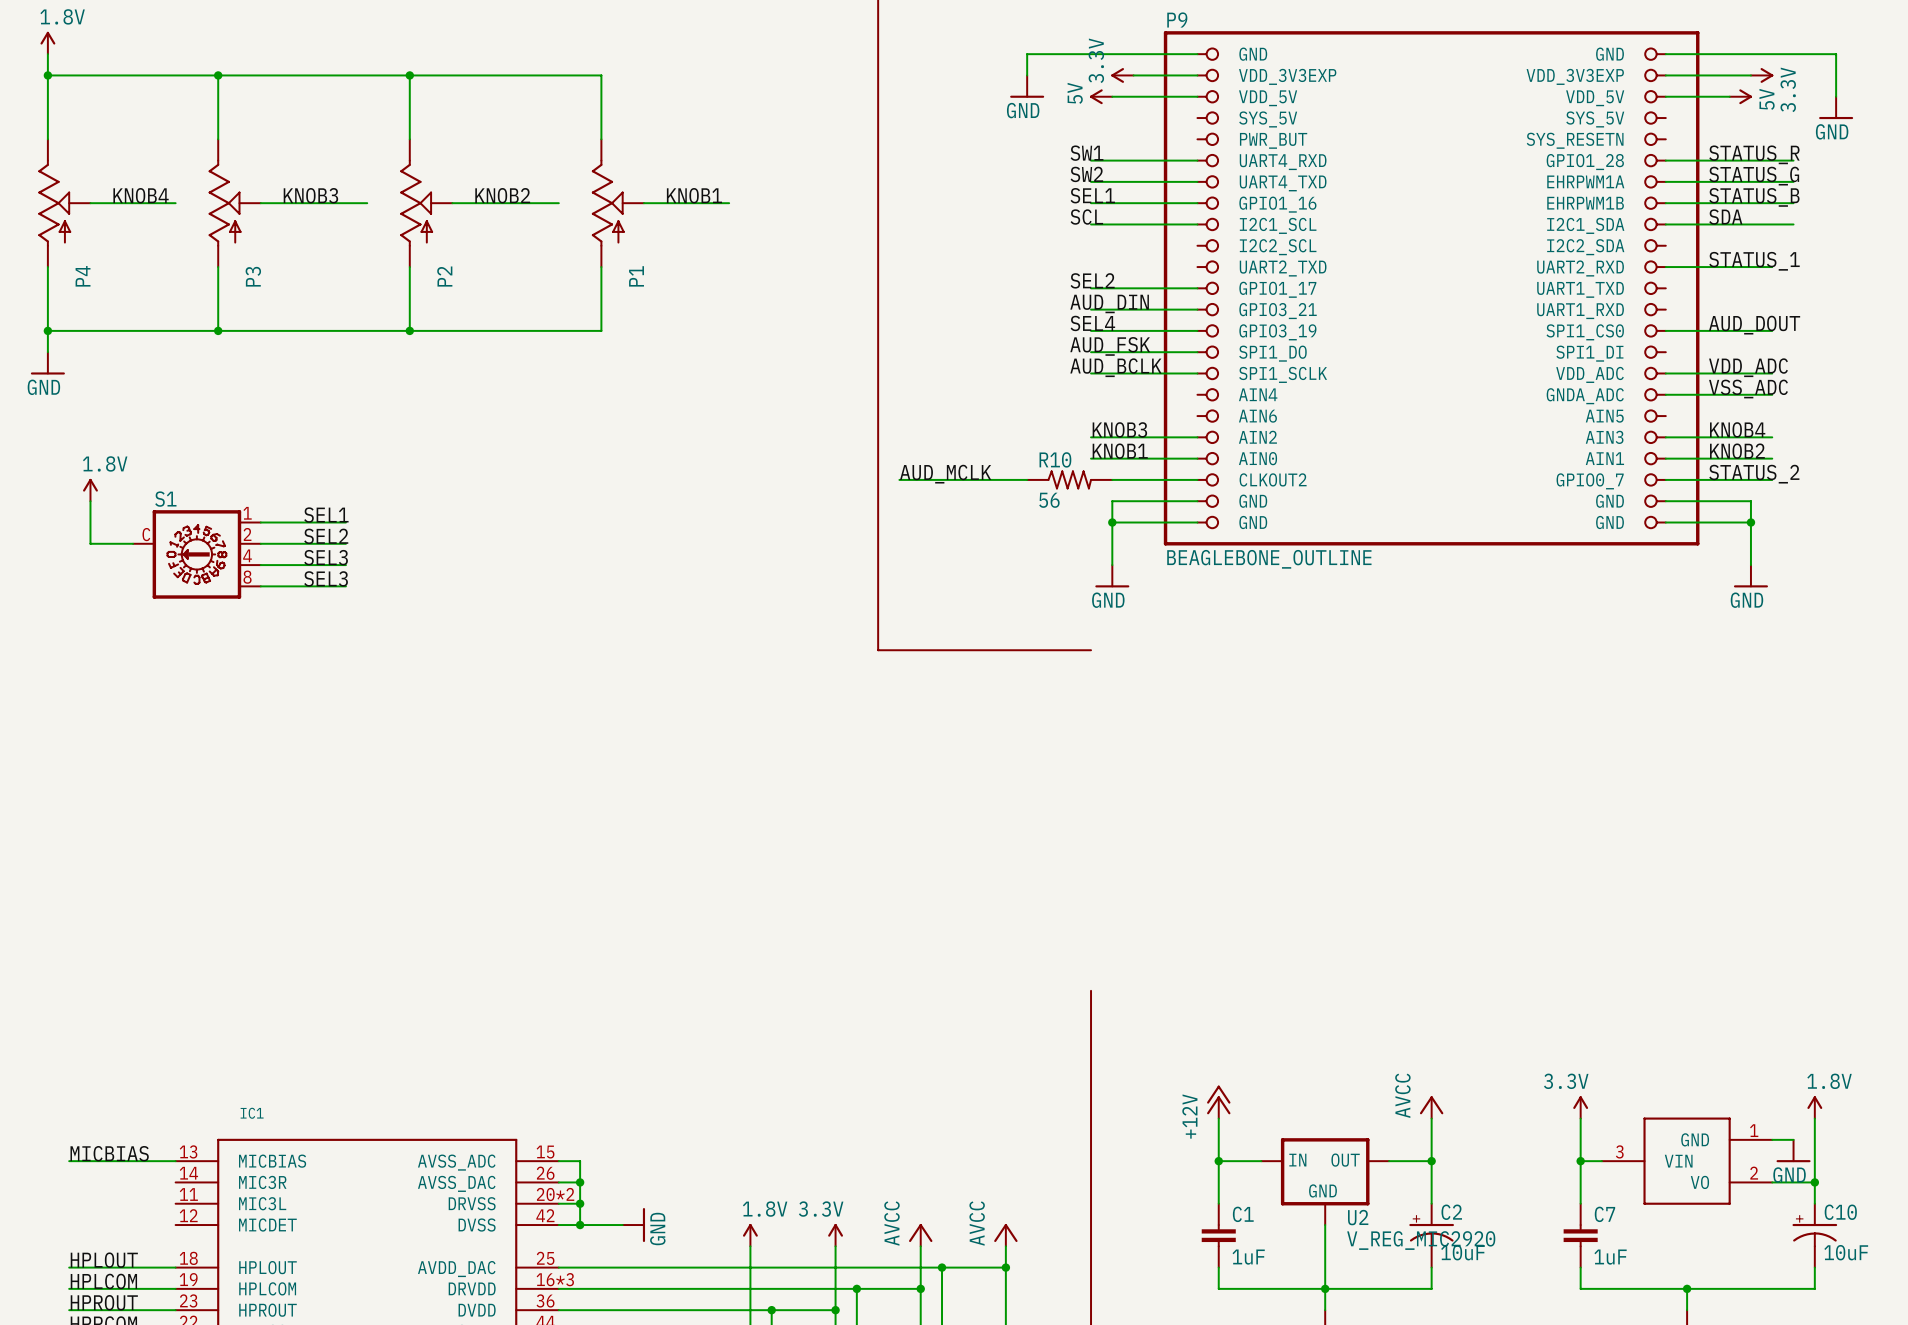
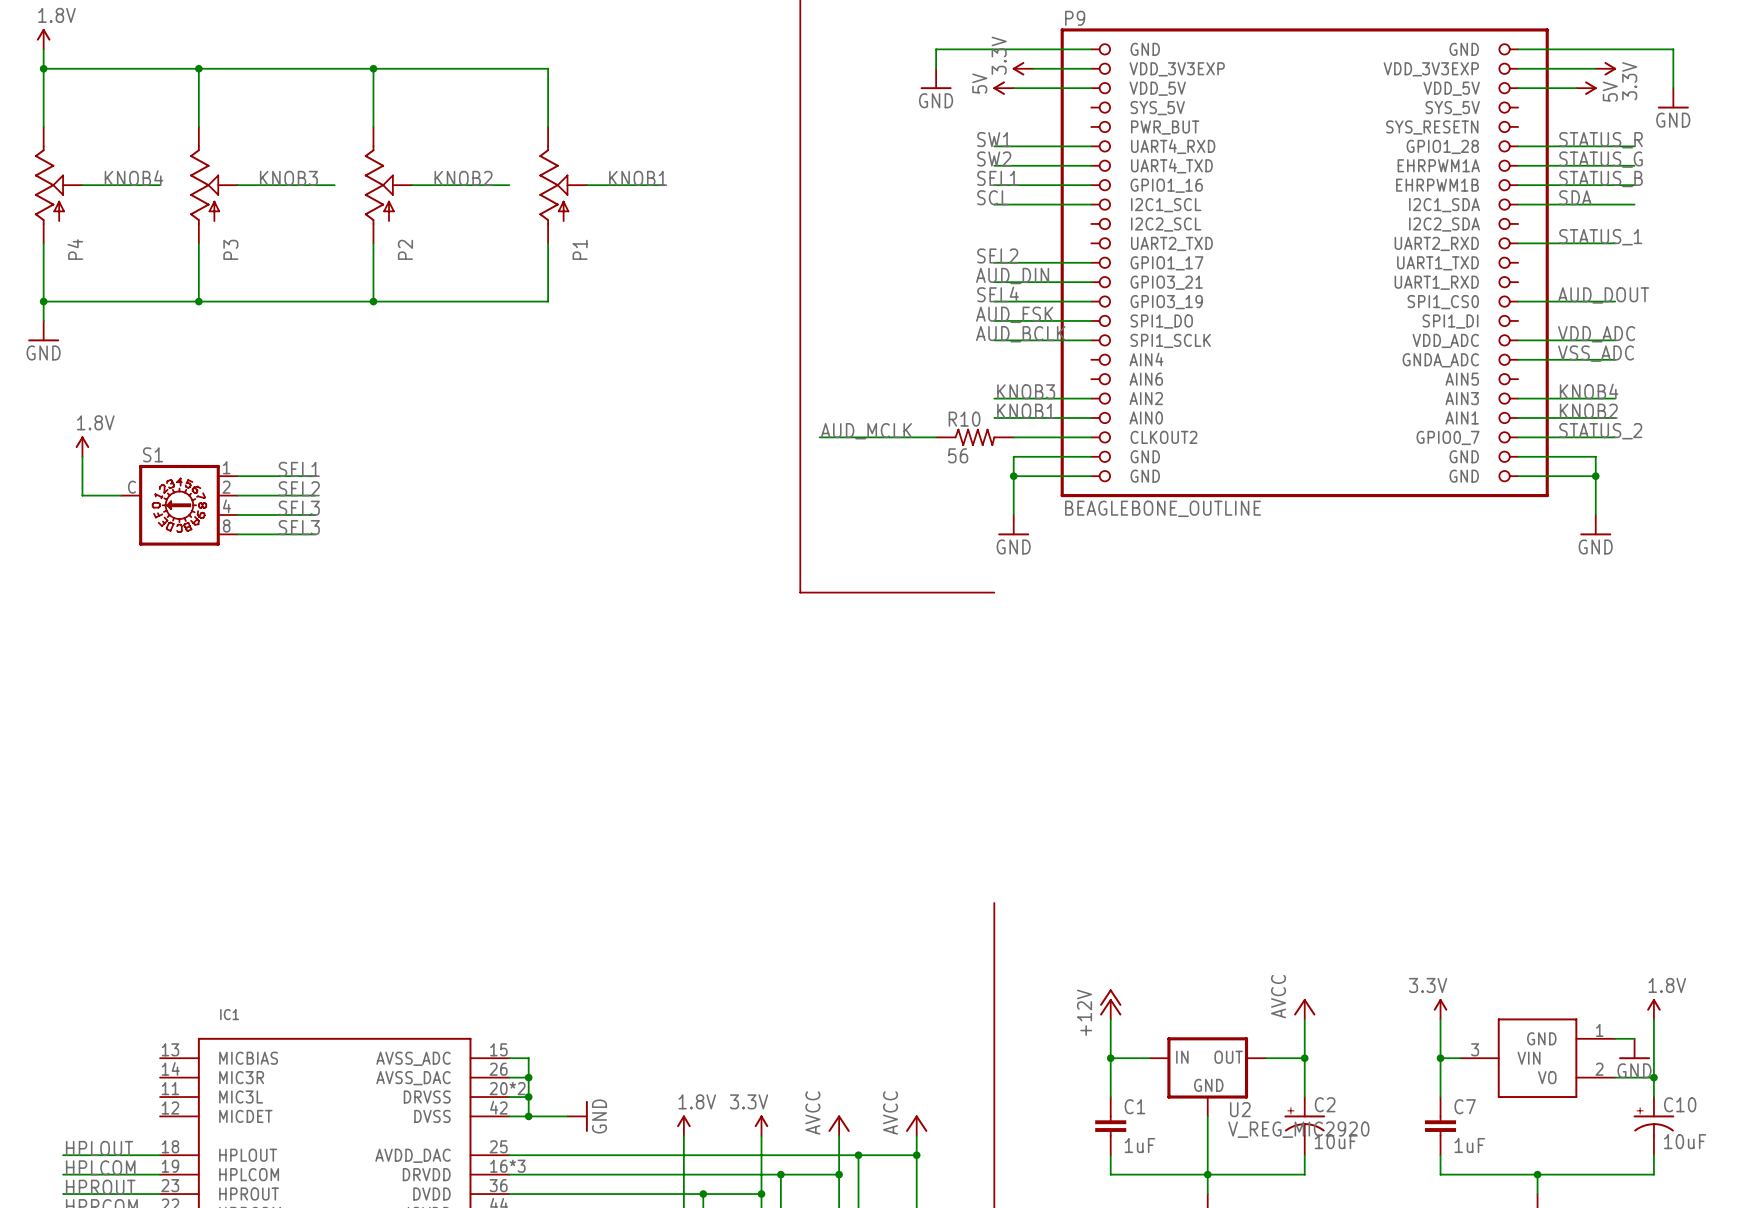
label: MICBIAS (109, 1153) -> none
wire: (69, 1161) (175, 1161) -> none

